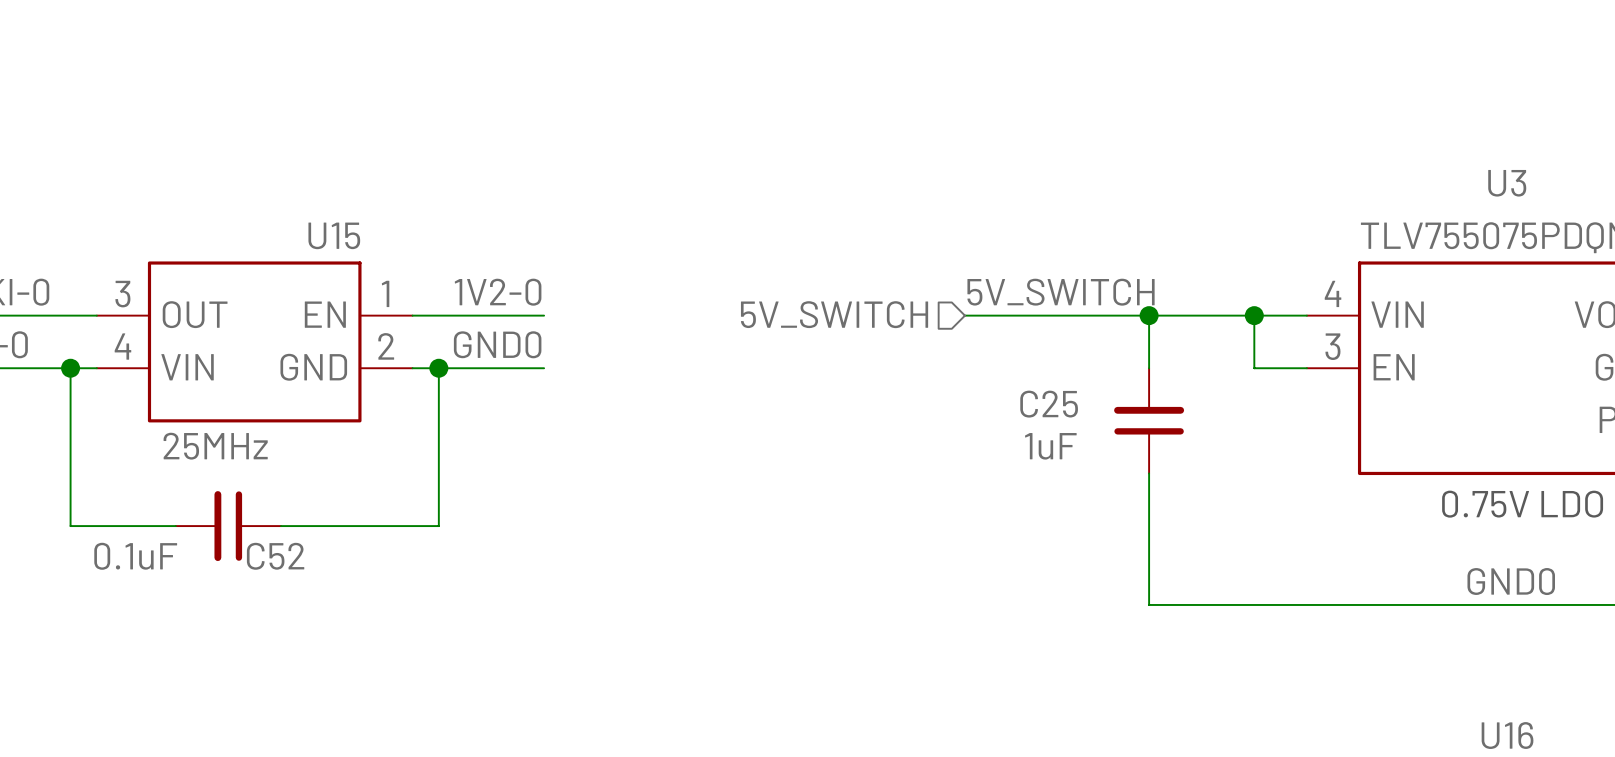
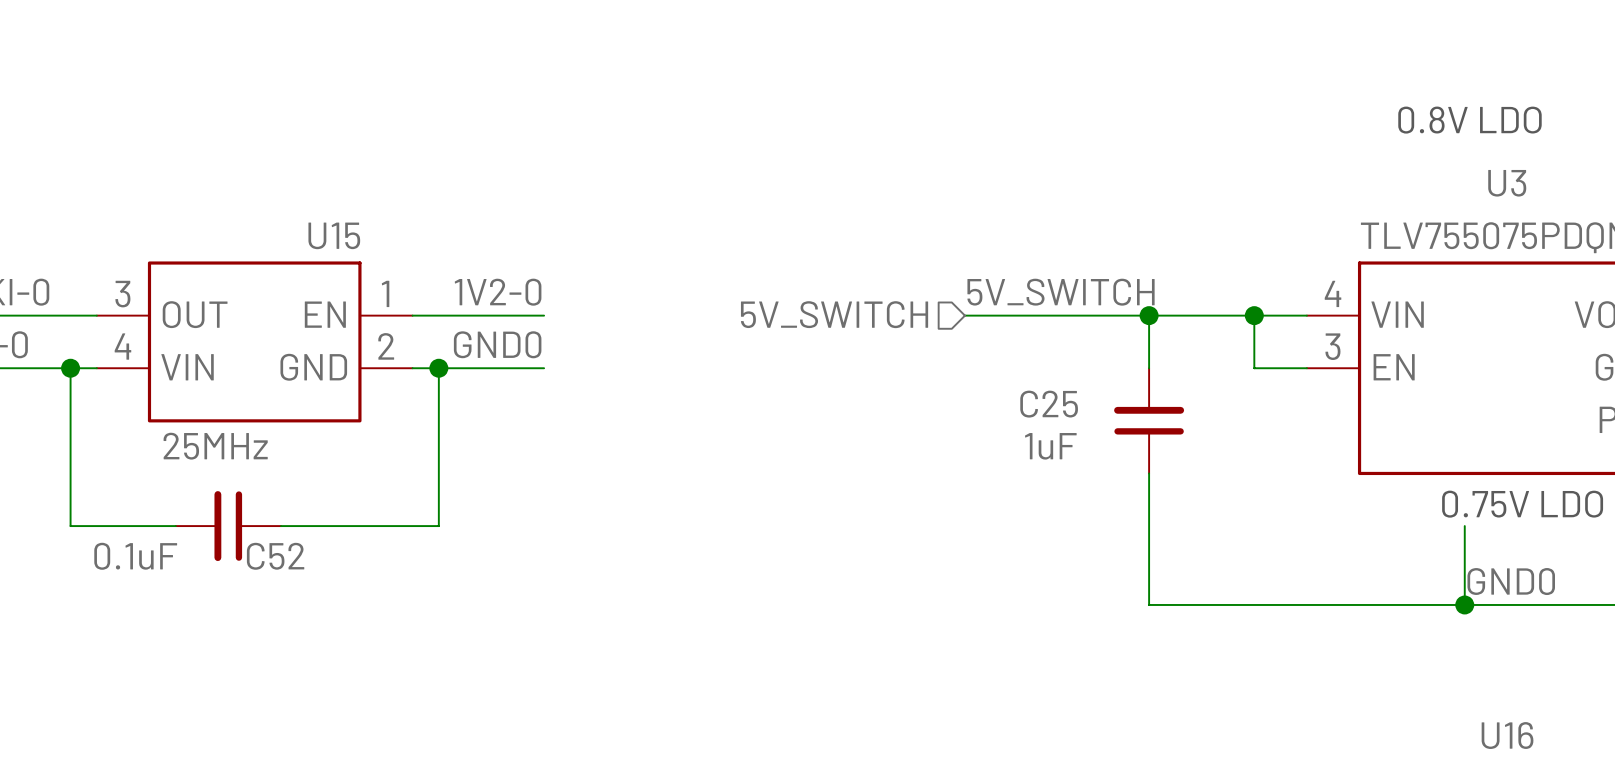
text: none -> 0.8V LDO (1469, 120)
wire: none -> (1464, 526) (1464, 604)
junction: none -> (1464, 604)

